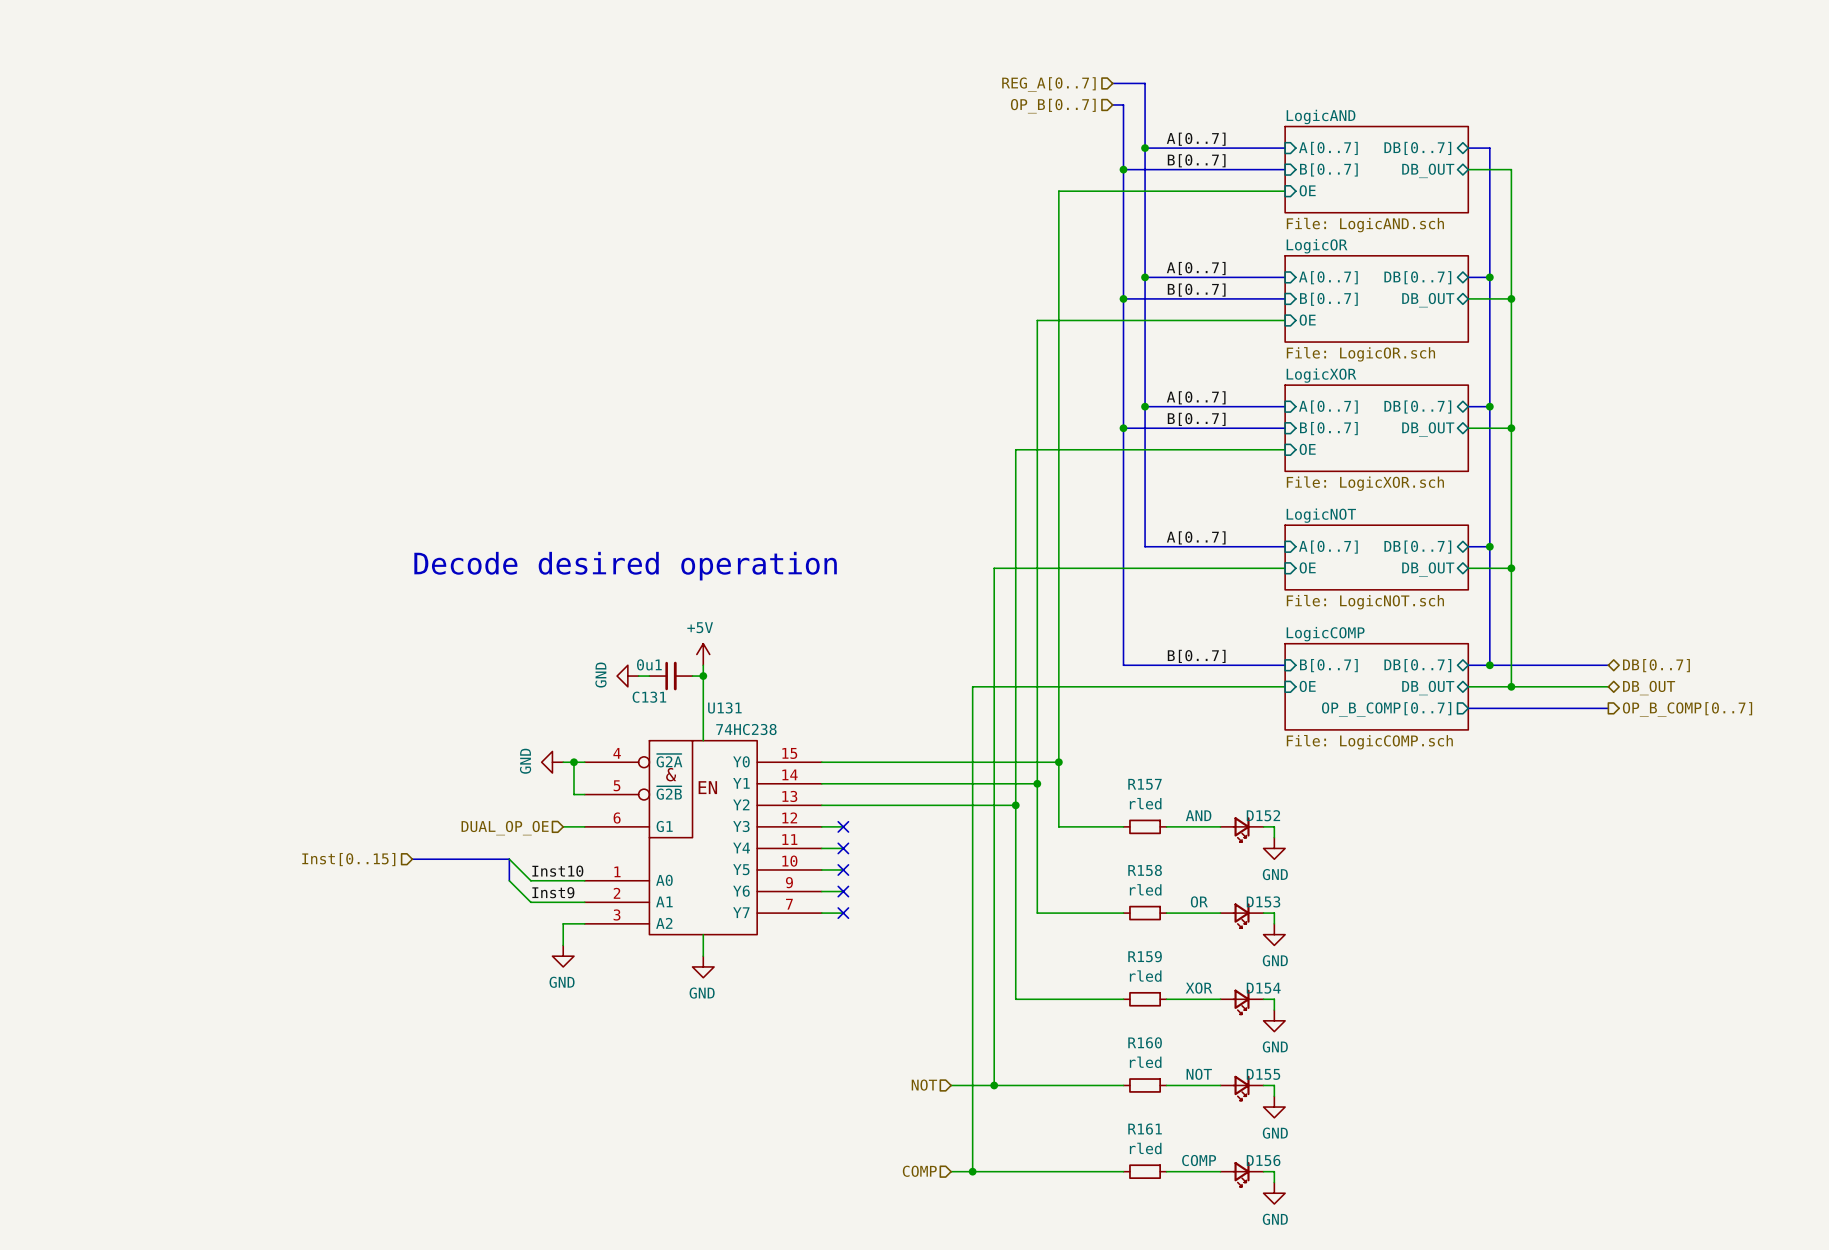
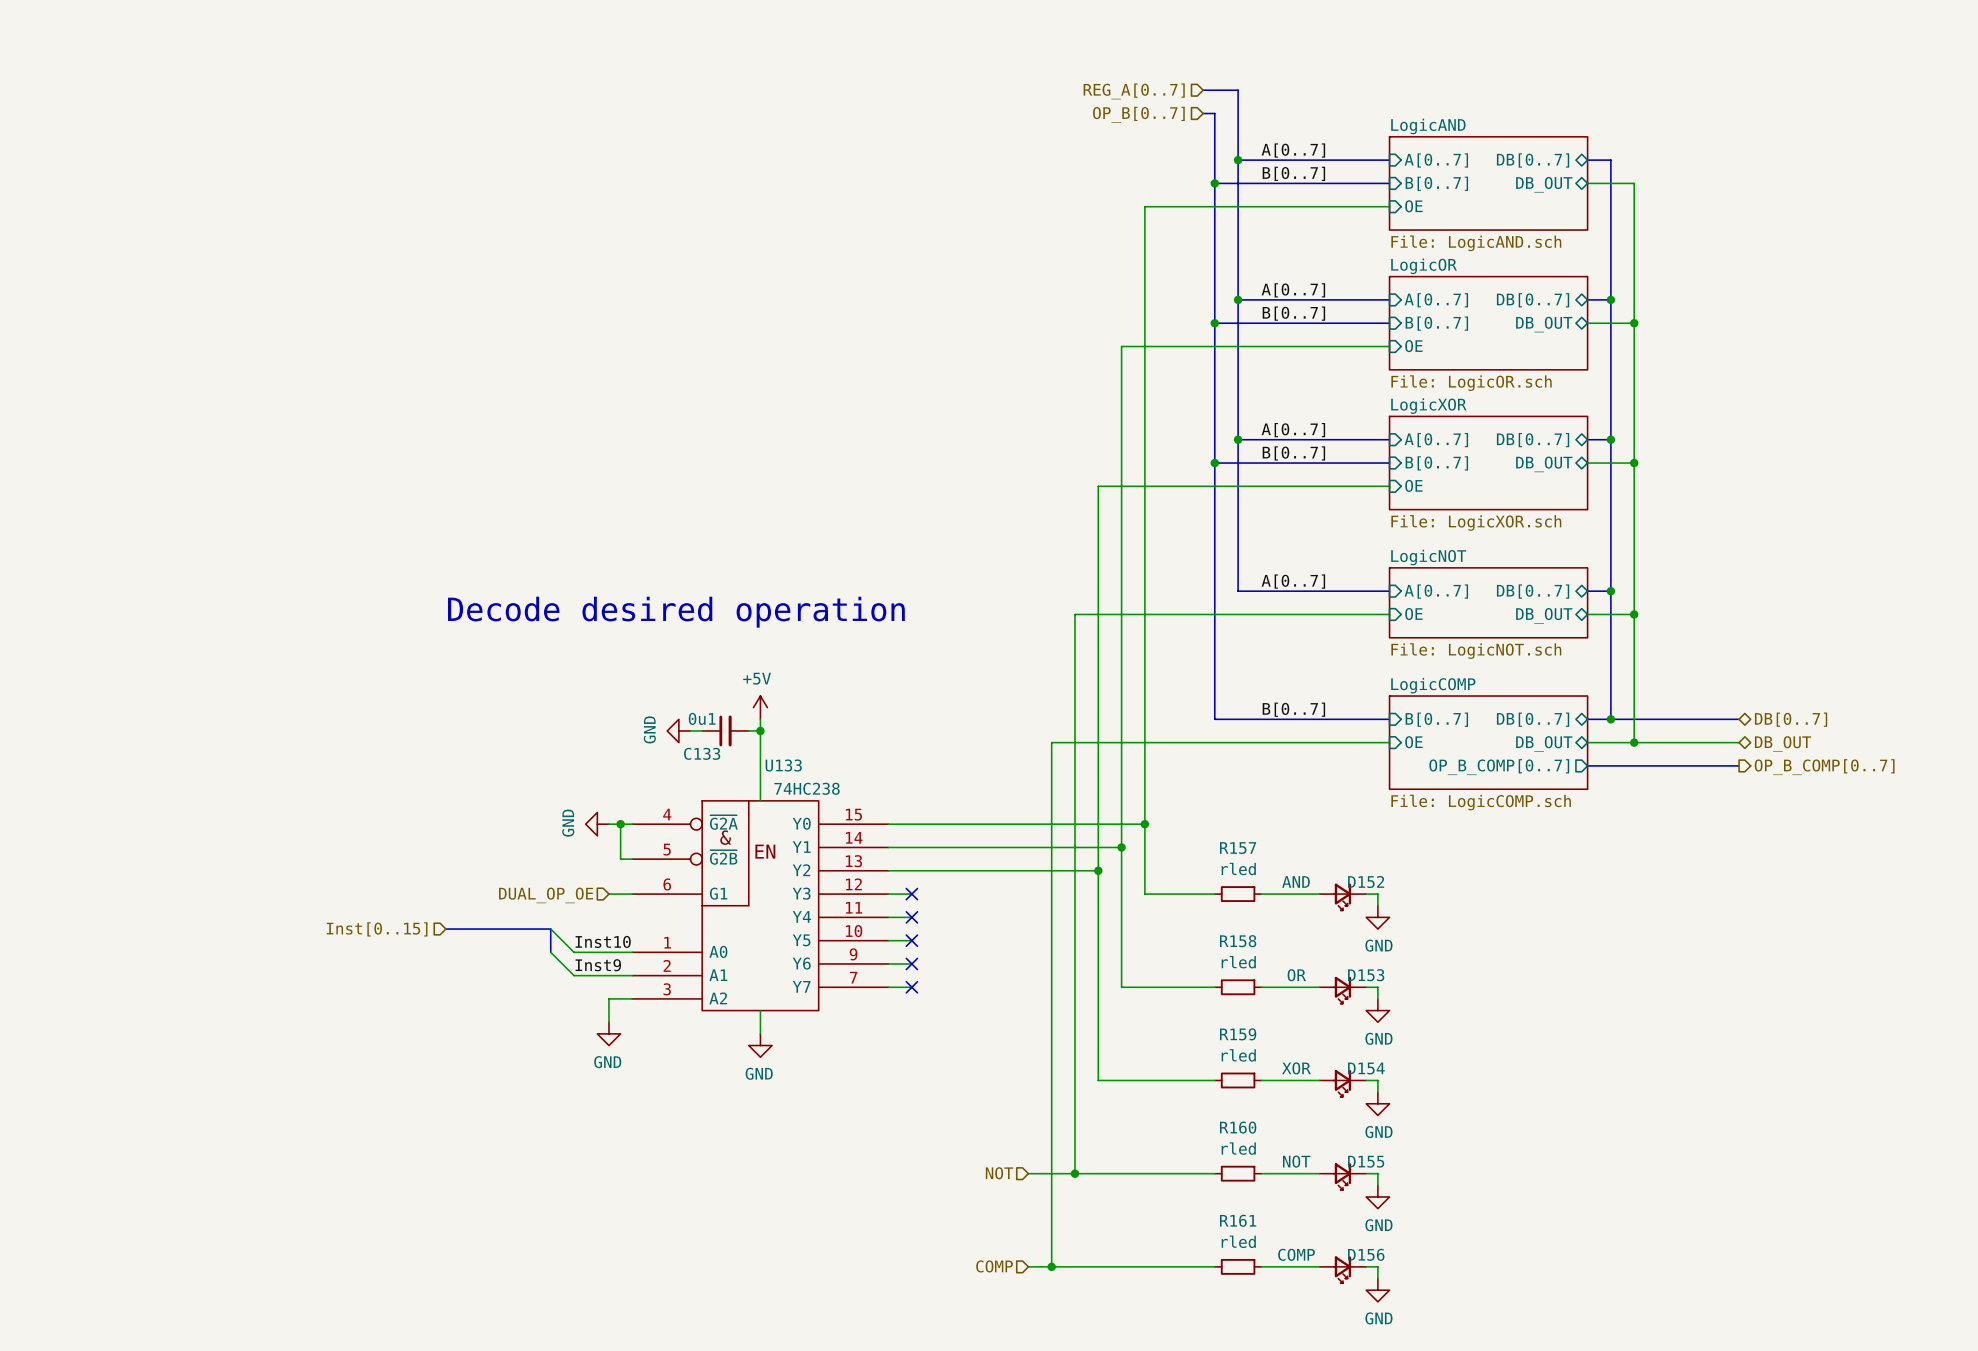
C131 name: C131 (649, 697) -> C133 (702, 753)
U131 name: U131 (724, 707) -> U133 (783, 765)

